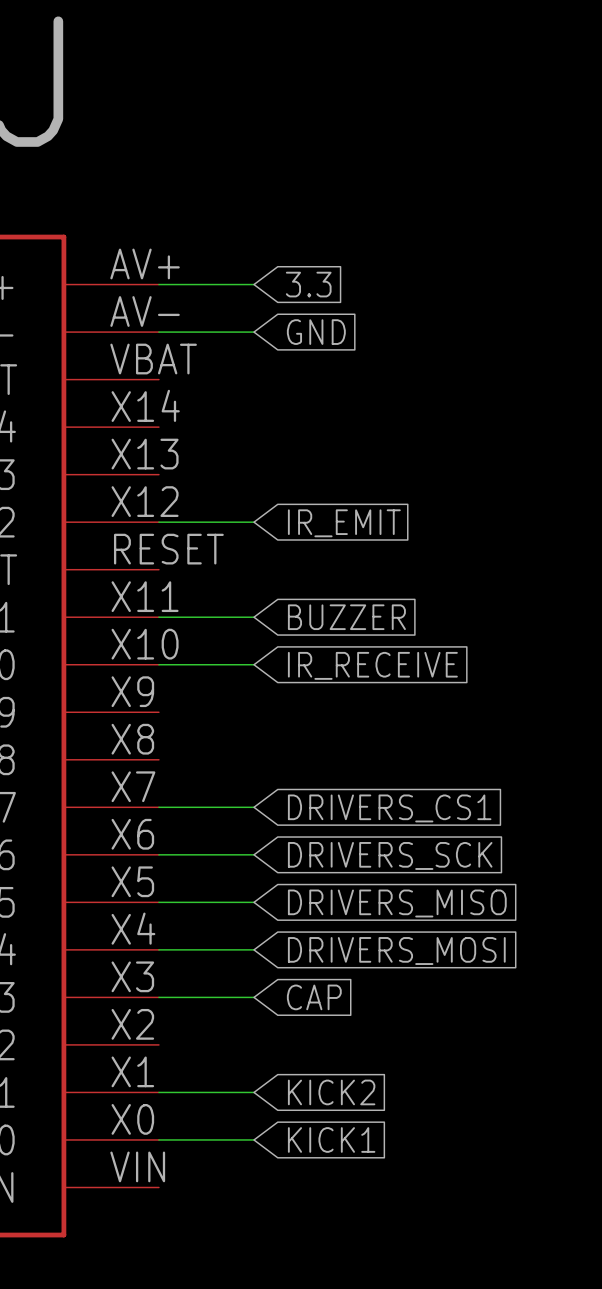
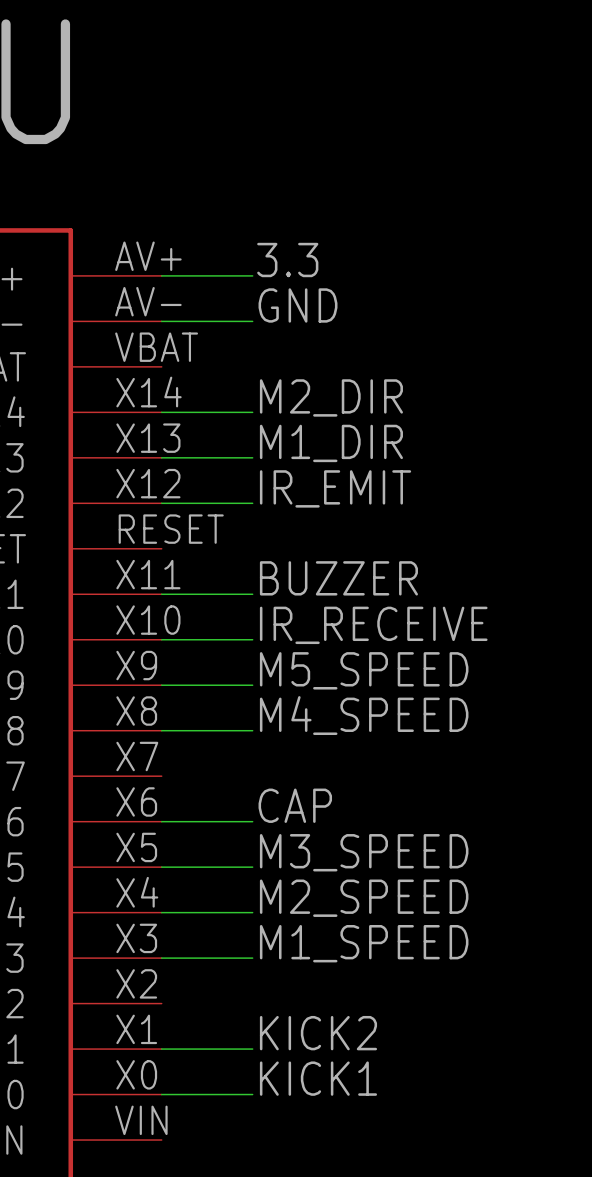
label: none -> 3.3 (287, 260)
global label: 3.3 (308, 284) -> none
label: none -> GND (298, 305)
global label: GND (316, 332) -> none
label: none -> M2_DIR (331, 397)
wire: none -> (161, 412) (252, 412)
label: none -> M1_DIR (331, 443)
wire: none -> (161, 457) (252, 457)
label: none -> IR_EMIT (335, 488)
global label: IR_EMIT (344, 523) -> none
label: none -> BUZZER (338, 578)
global label: BUZZER (346, 617) -> none
label: none -> IR_RECEIVE (373, 625)
global label: IR_RECEIVE (372, 665) -> none
label: none -> M5_SPEED (364, 670)
wire: none -> (161, 685) (252, 685)
label: none -> M4_SPEED (364, 715)
wire: (158, 807) (254, 807) -> (161, 730) (252, 730)
global label: DRIVERS_CS1 (389, 808) -> none
label: none -> CAP (295, 805)
global label: DRIVERS_SCK (390, 855) -> none
label: none -> M3_SPEED (364, 852)
global label: DRIVERS_MISO (397, 903) -> none
label: none -> M2_SPEED (364, 898)
global label: DRIVERS_MOSI (396, 951) -> none
label: none -> M1_SPEED (364, 943)
global label: CAP (314, 997) -> none
label: none -> KICK2 (318, 1033)
global label: KICK2 (331, 1092) -> none
label: none -> KICK1 (318, 1078)
global label: KICK1 (331, 1139) -> none

